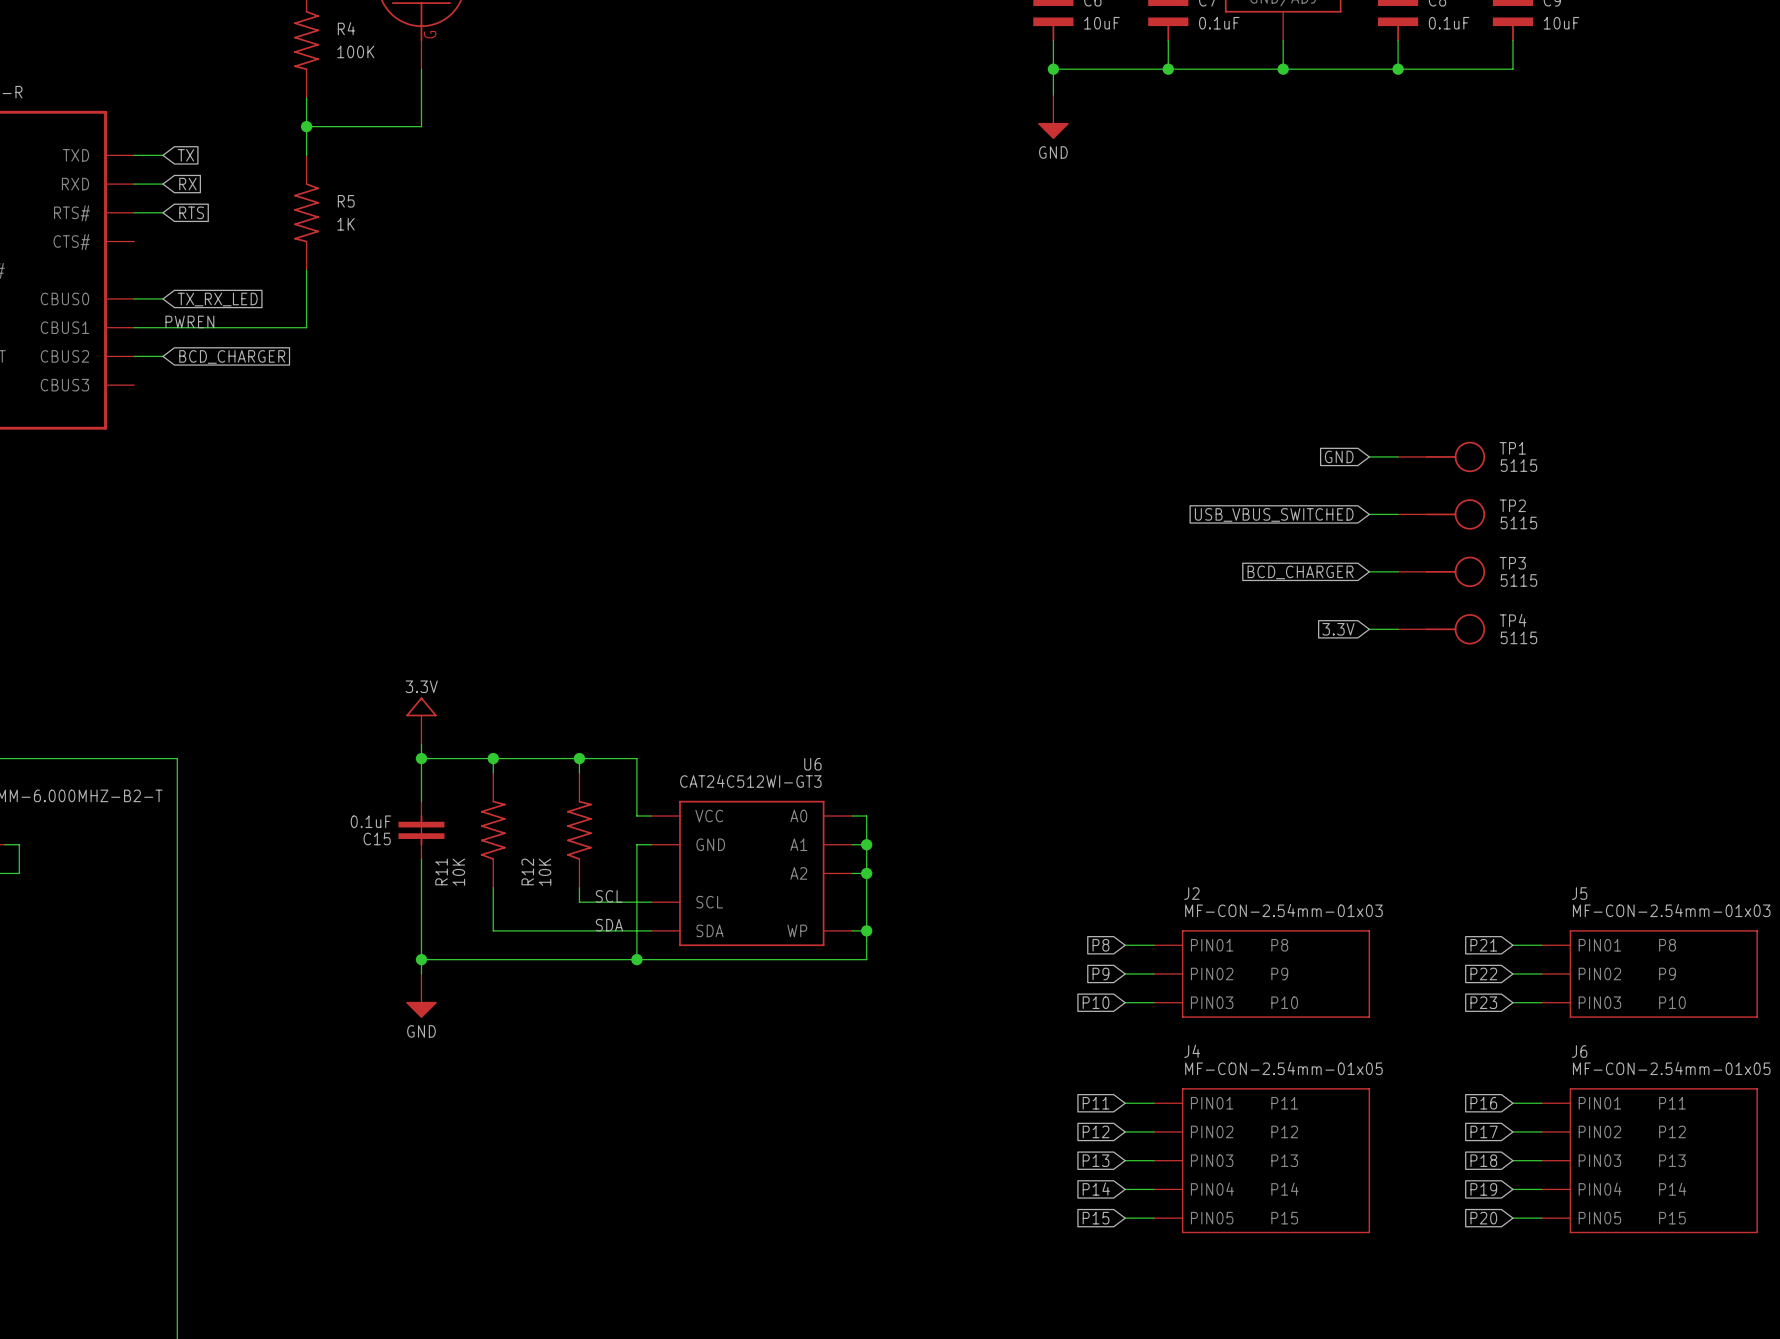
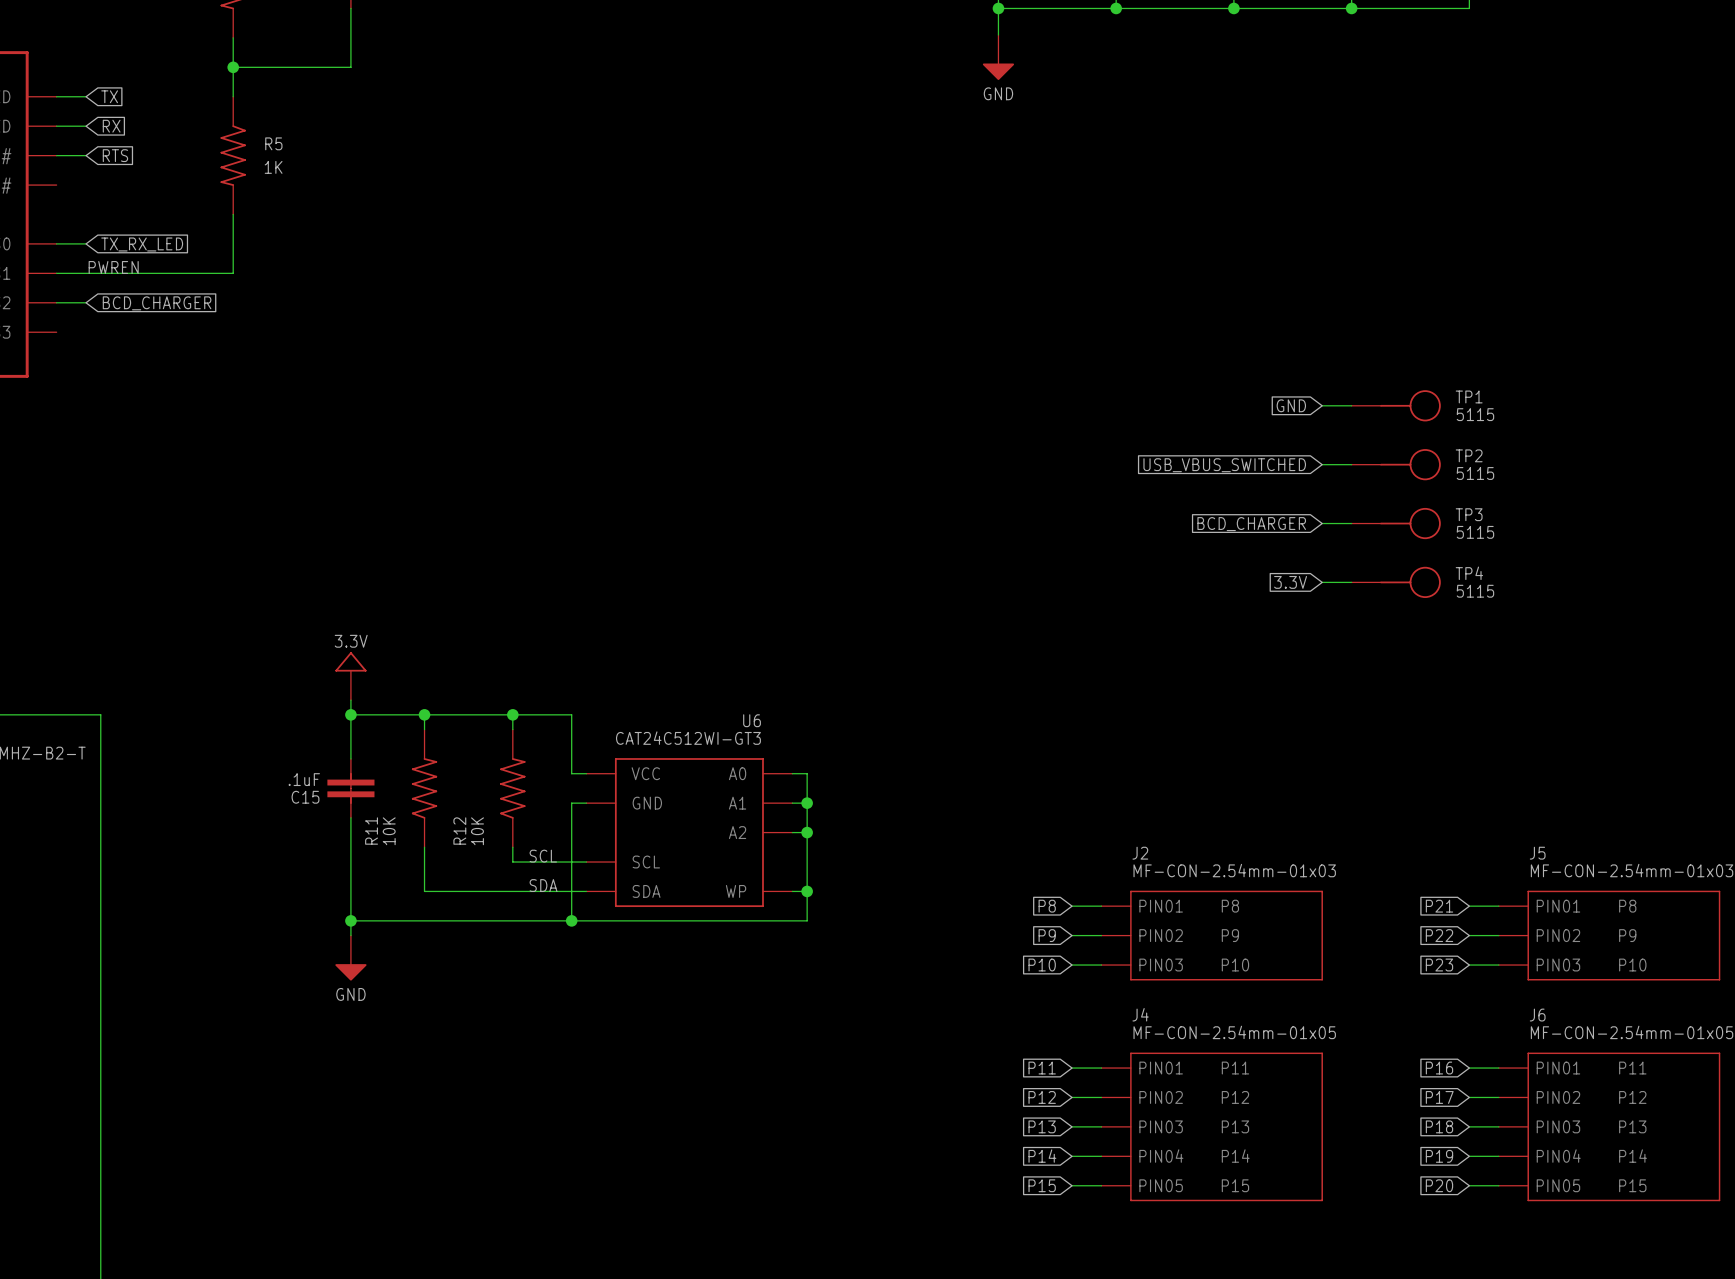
C15 value: 0.1uF (370, 821) -> .1uF (304, 779)

